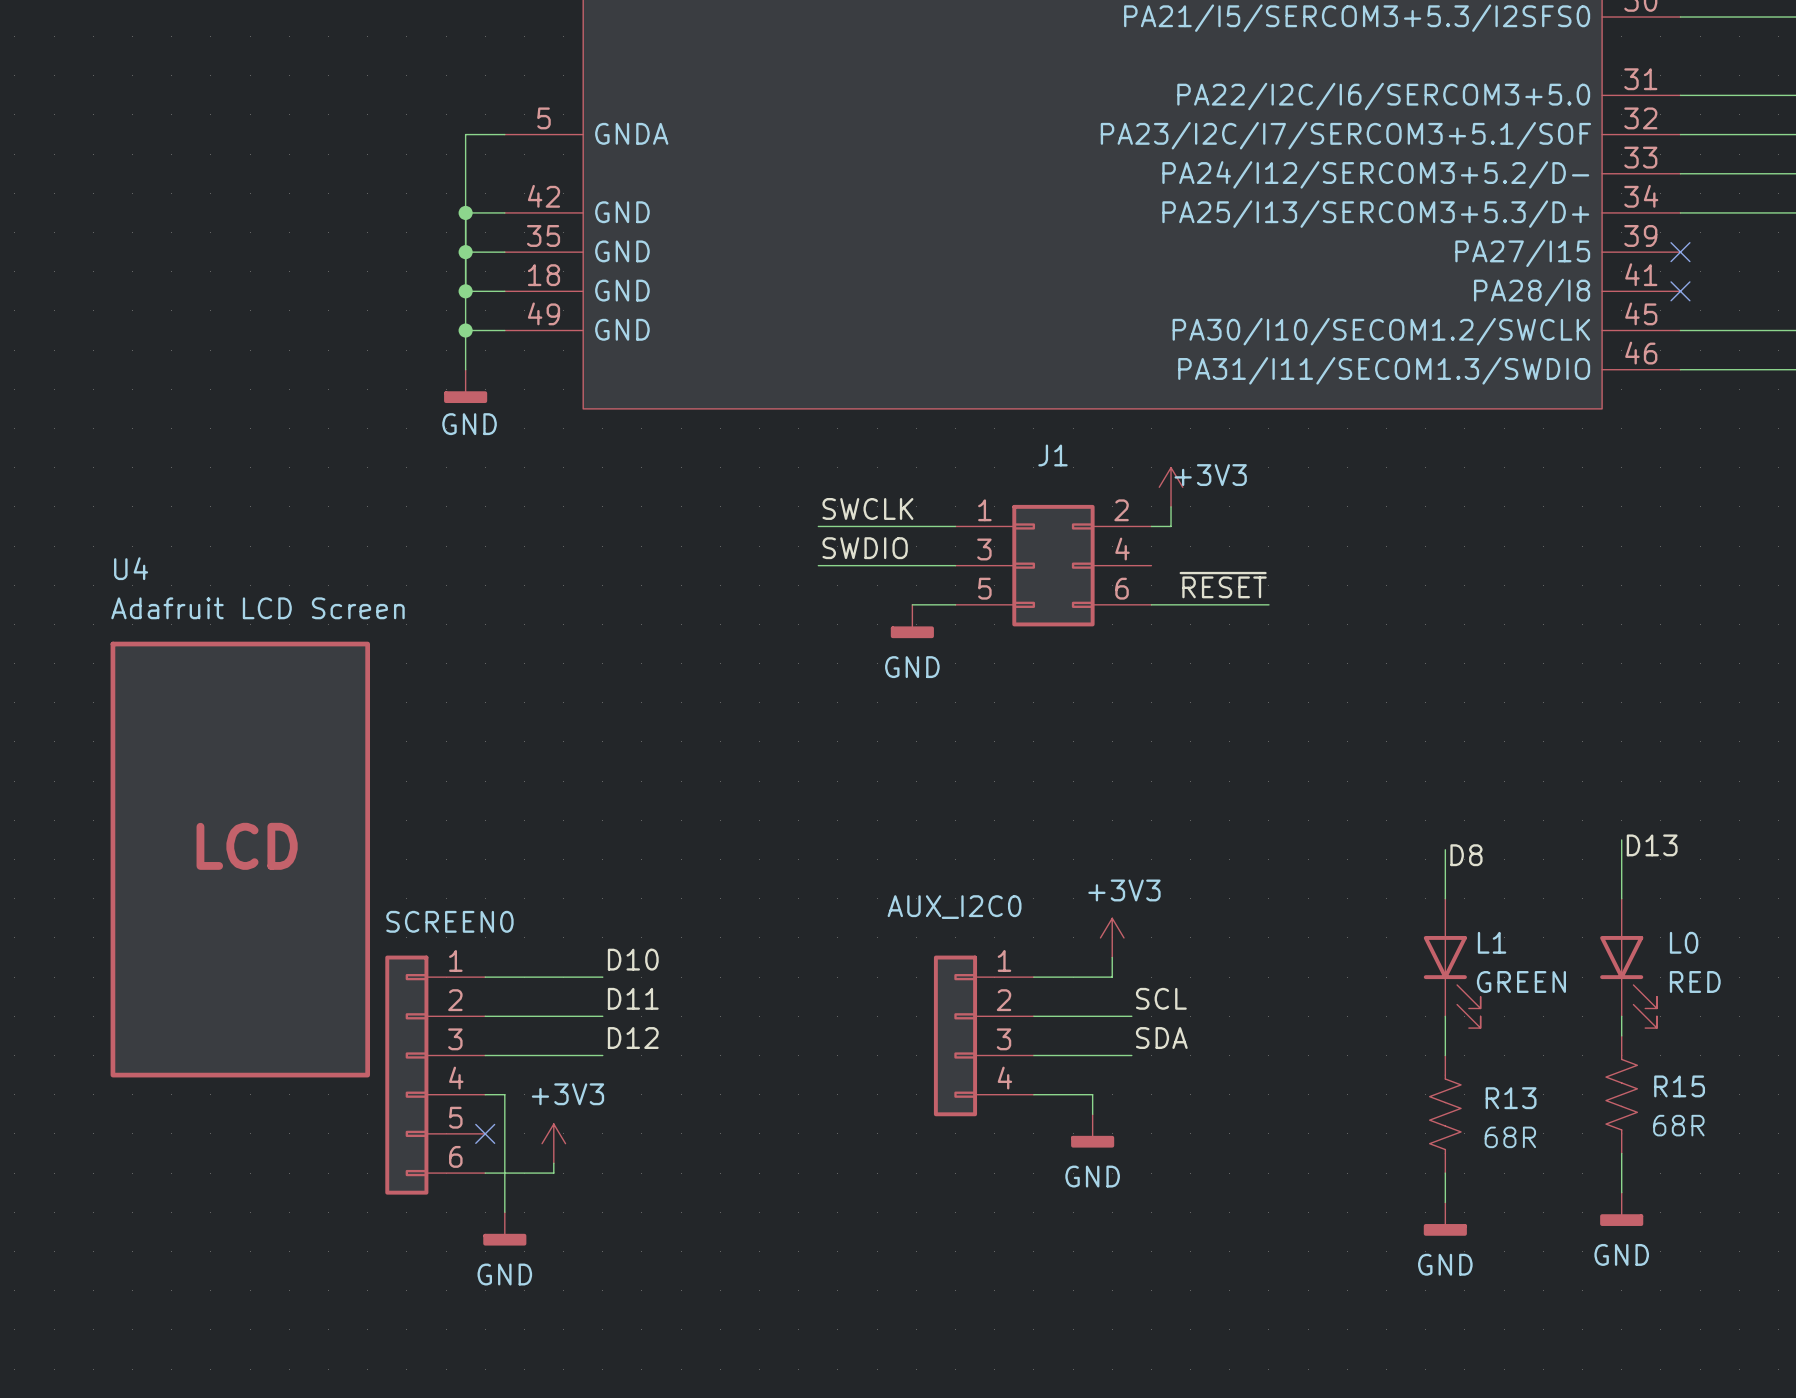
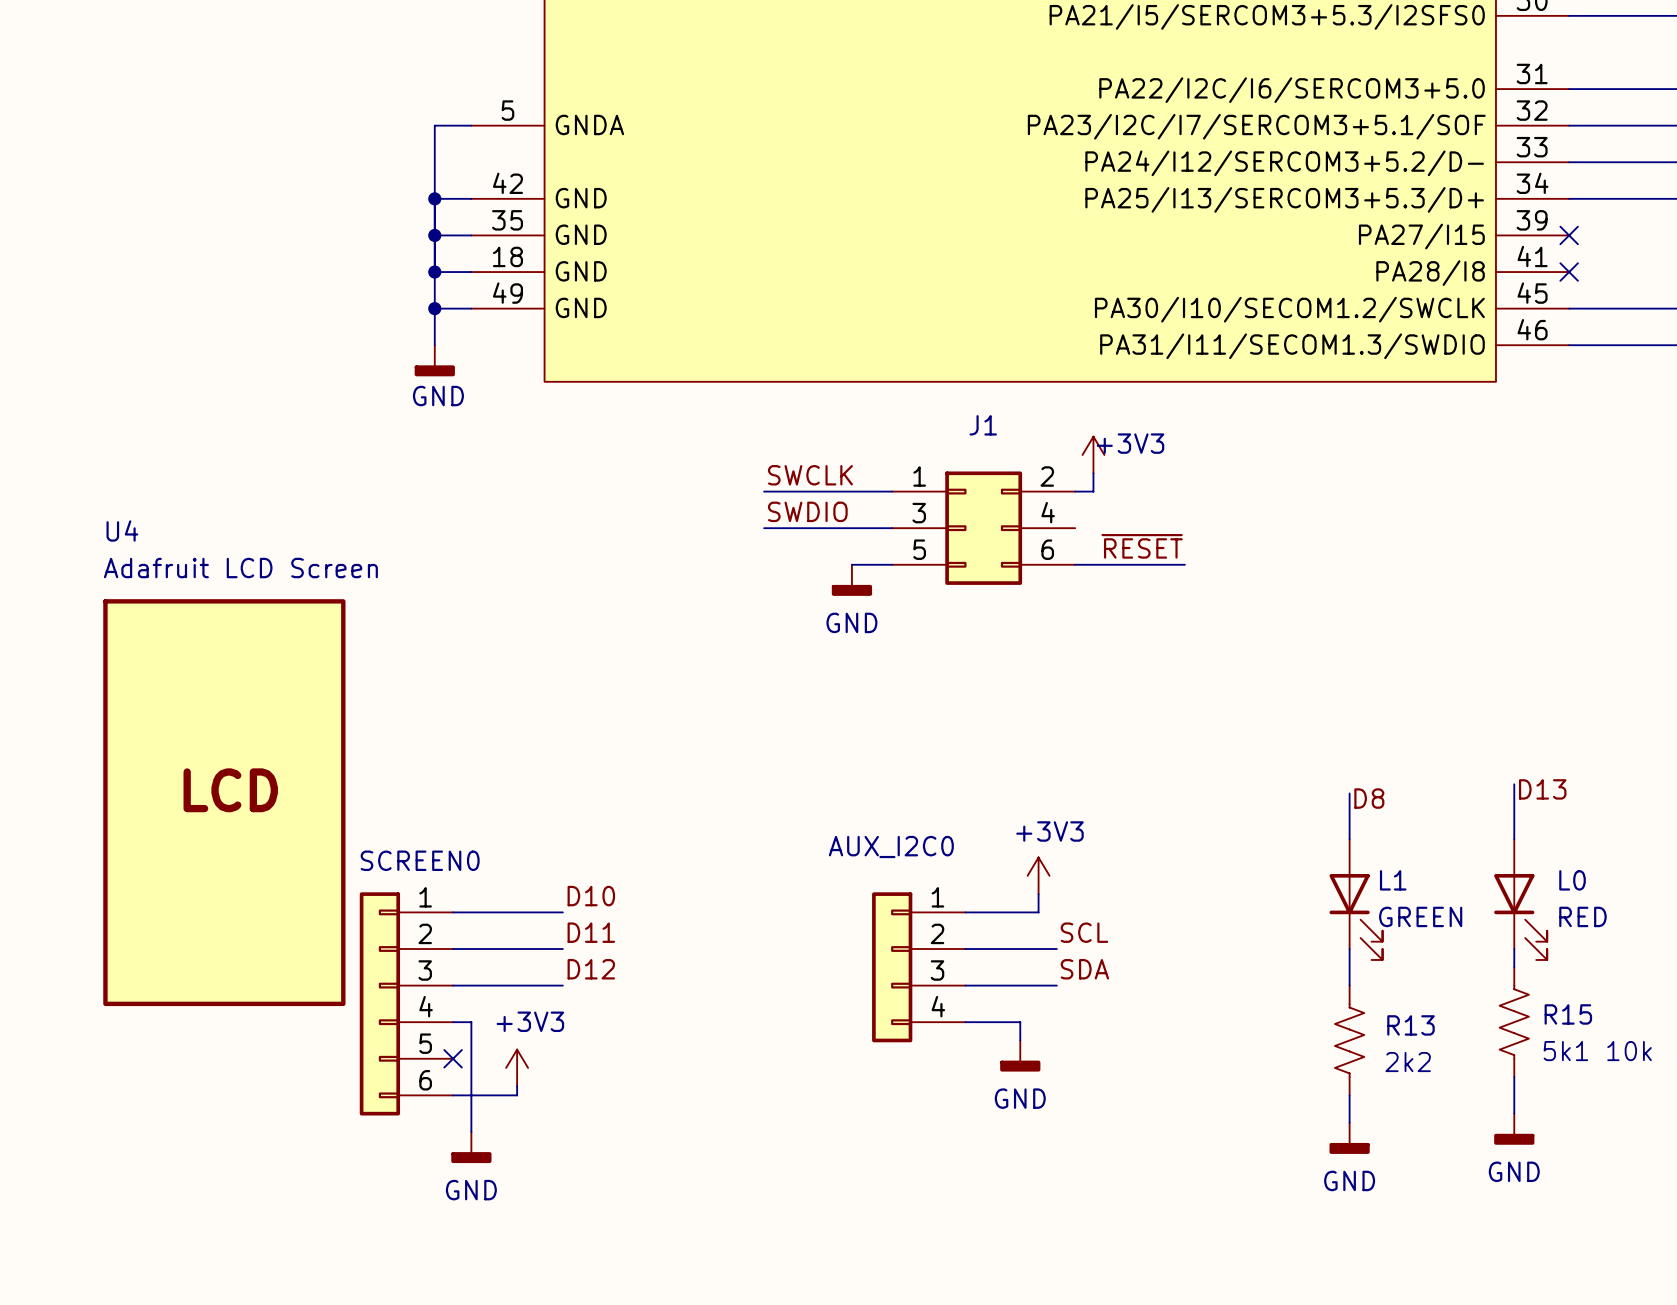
R15 value: 68R (1678, 1125) -> 5k1 10k (1597, 1051)
R13 value: 68R (1510, 1137) -> 2k2 (1408, 1062)

